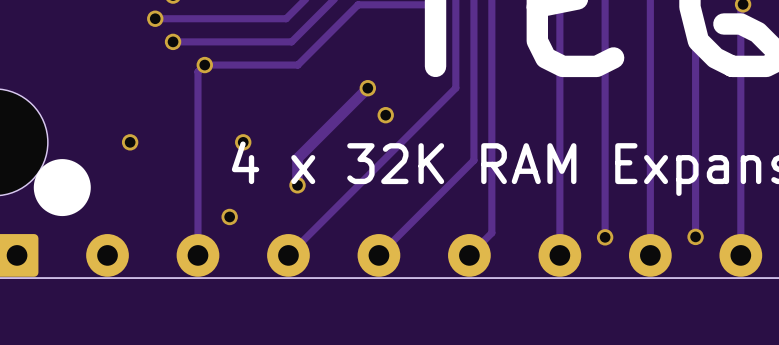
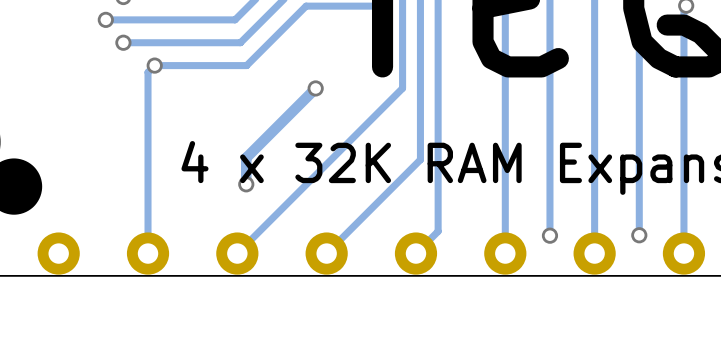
via: (385, 115) -> none
via: (130, 142) -> none
via: (243, 142) -> none
via: (229, 216) -> none

